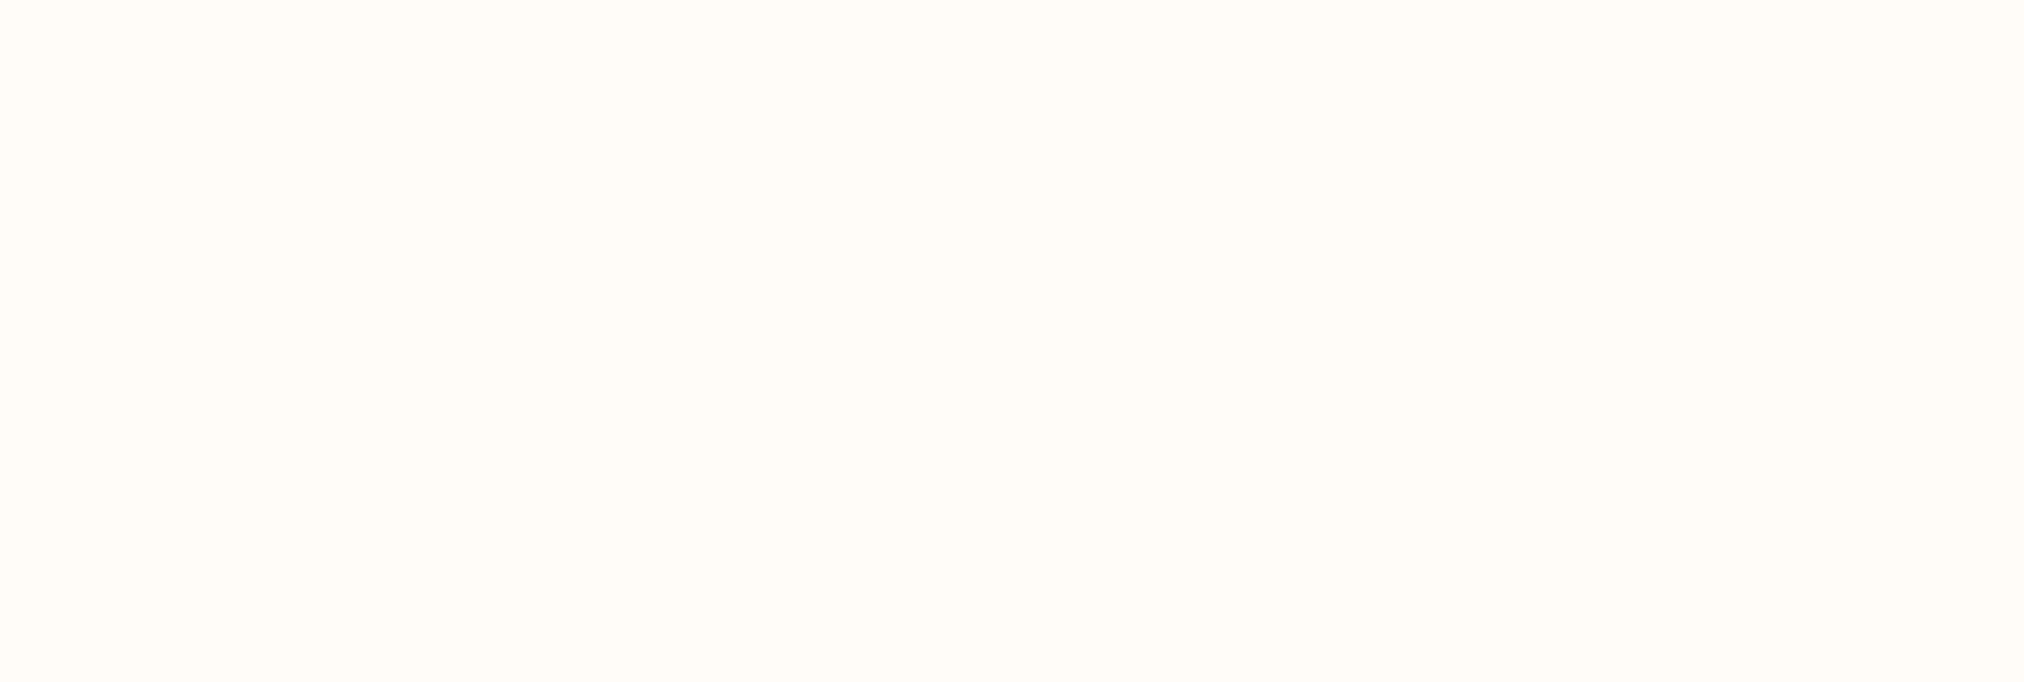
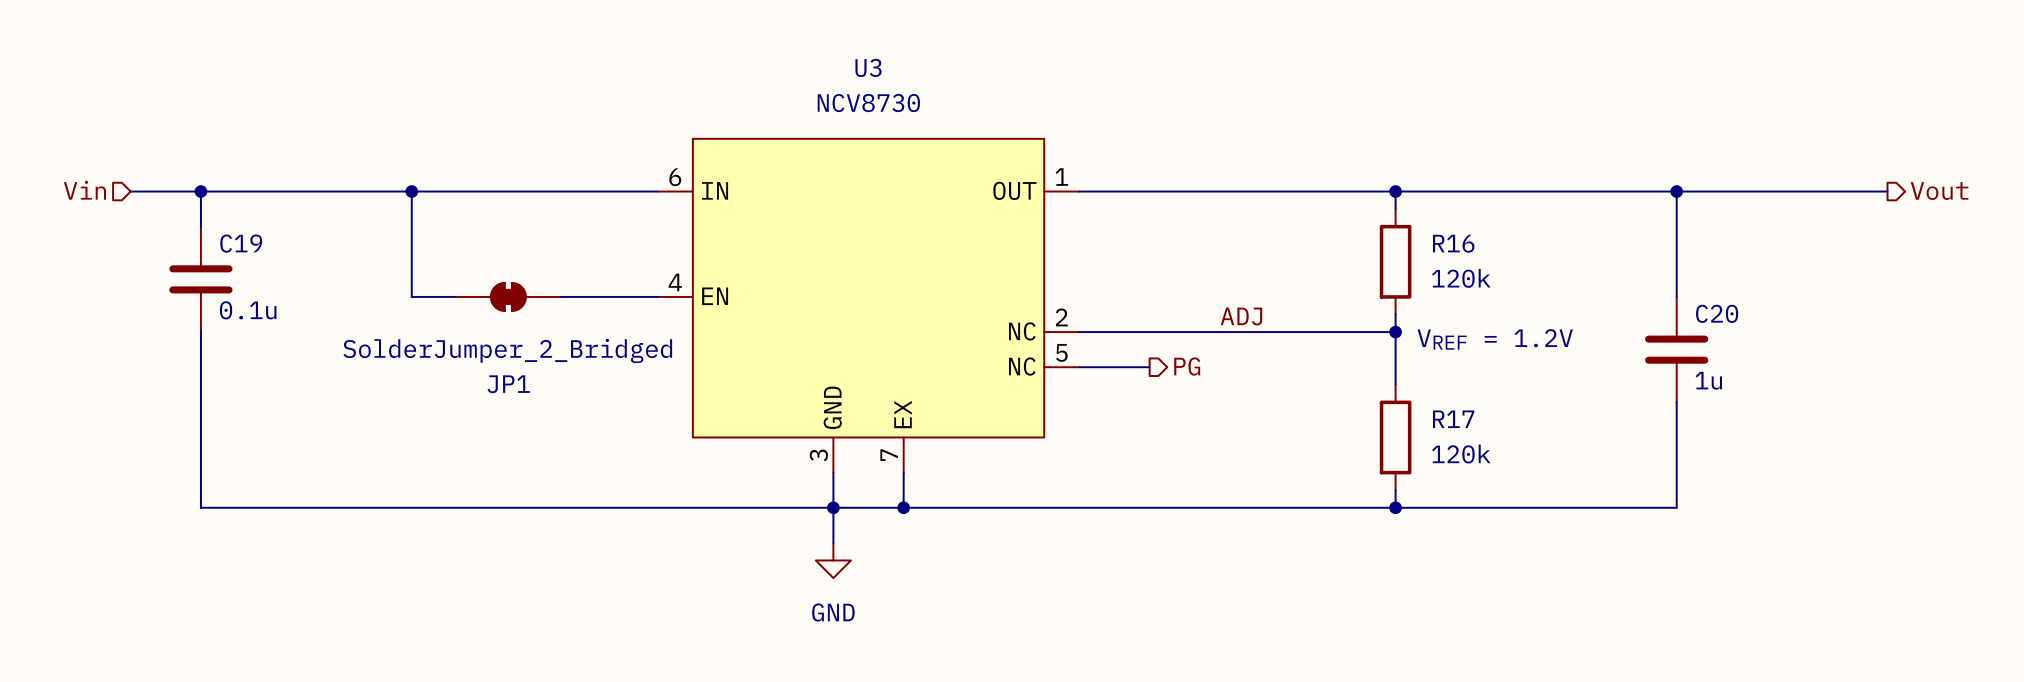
hierarchical label: none -> Vin (84, 190)
wire: none -> (130, 191) (657, 191)
wire: none -> (200, 191) (200, 226)
junction: none -> (200, 191)
wire: none -> (411, 191) (411, 296) (455, 296)
junction: none -> (411, 191)
wire: none -> (1079, 191) (1887, 191)
wire: none -> (1395, 191) (1395, 209)
junction: none -> (1395, 191)
wire: none -> (1676, 191) (1676, 296)
junction: none -> (1676, 191)
hierarchical label: none -> Vout (1939, 191)
R16: none -> 120k (1395, 261)
C19: none -> 0.1u (200, 279)
JP1: none -> SolderJumper_2_Bridged (508, 296)
wire: none -> (561, 296) (657, 296)
U3: none -> NCV8730 (868, 305)
wire: none -> (1395, 314) (1395, 384)
label: none -> ADJ (1241, 316)
wire: none -> (200, 332) (200, 507) (1676, 507) (1676, 402)
wire: none -> (1079, 332) (1395, 332)
junction: none -> (1395, 332)
text: none -> VREF = 1.2V (1495, 339)
C20: none -> 1u (1676, 349)
hierarchical label: none -> PG (1187, 366)
wire: none -> (1079, 367) (1149, 367)
R17: none -> 120k (1395, 437)
wire: none -> (833, 472) (833, 542)
wire: none -> (903, 472) (903, 507)
wire: none -> (1395, 490) (1395, 507)
junction: none -> (833, 507)
junction: none -> (903, 507)
junction: none -> (1395, 507)
power symbol: none -> GND (833, 560)

